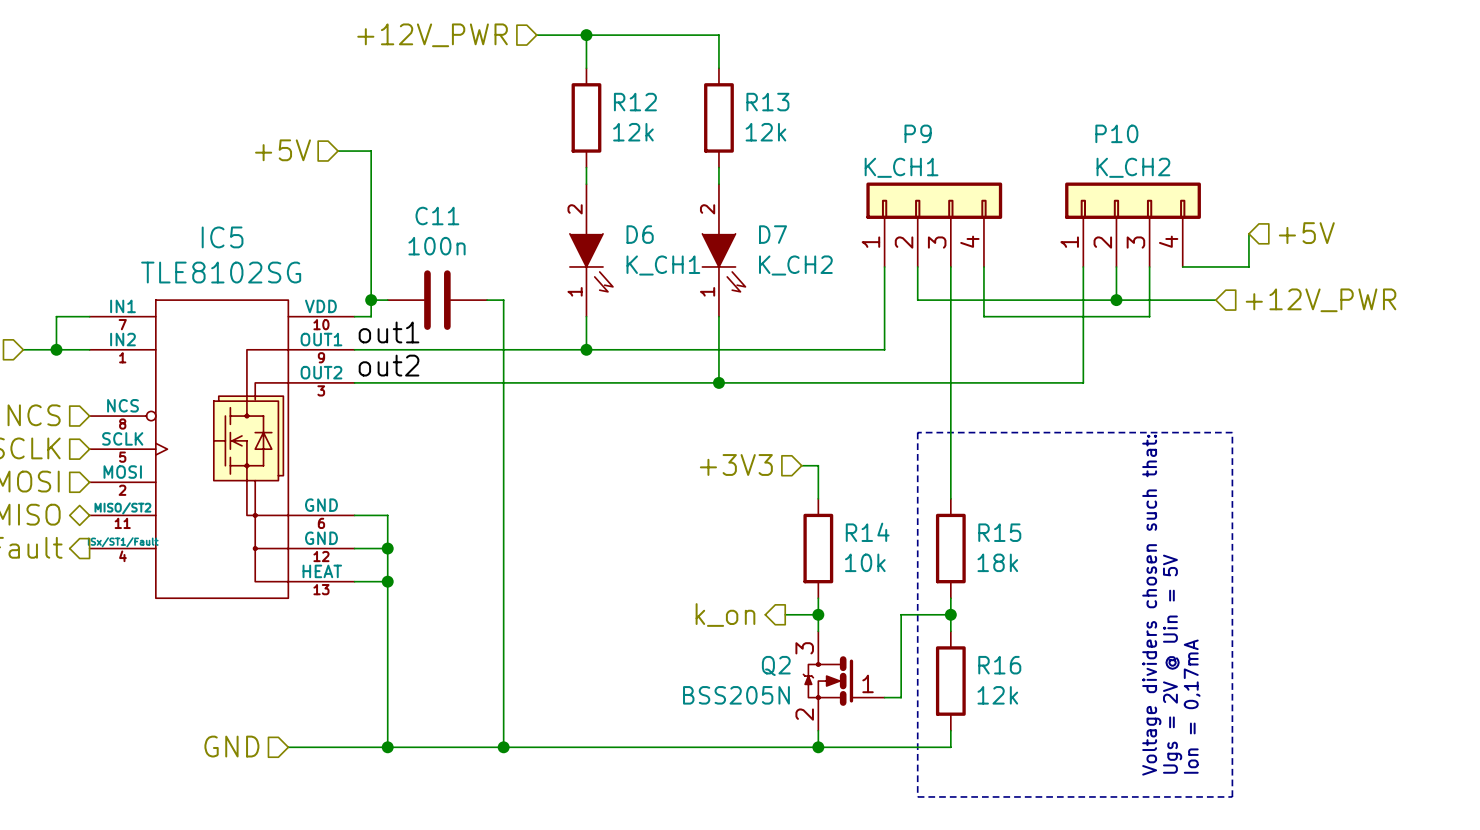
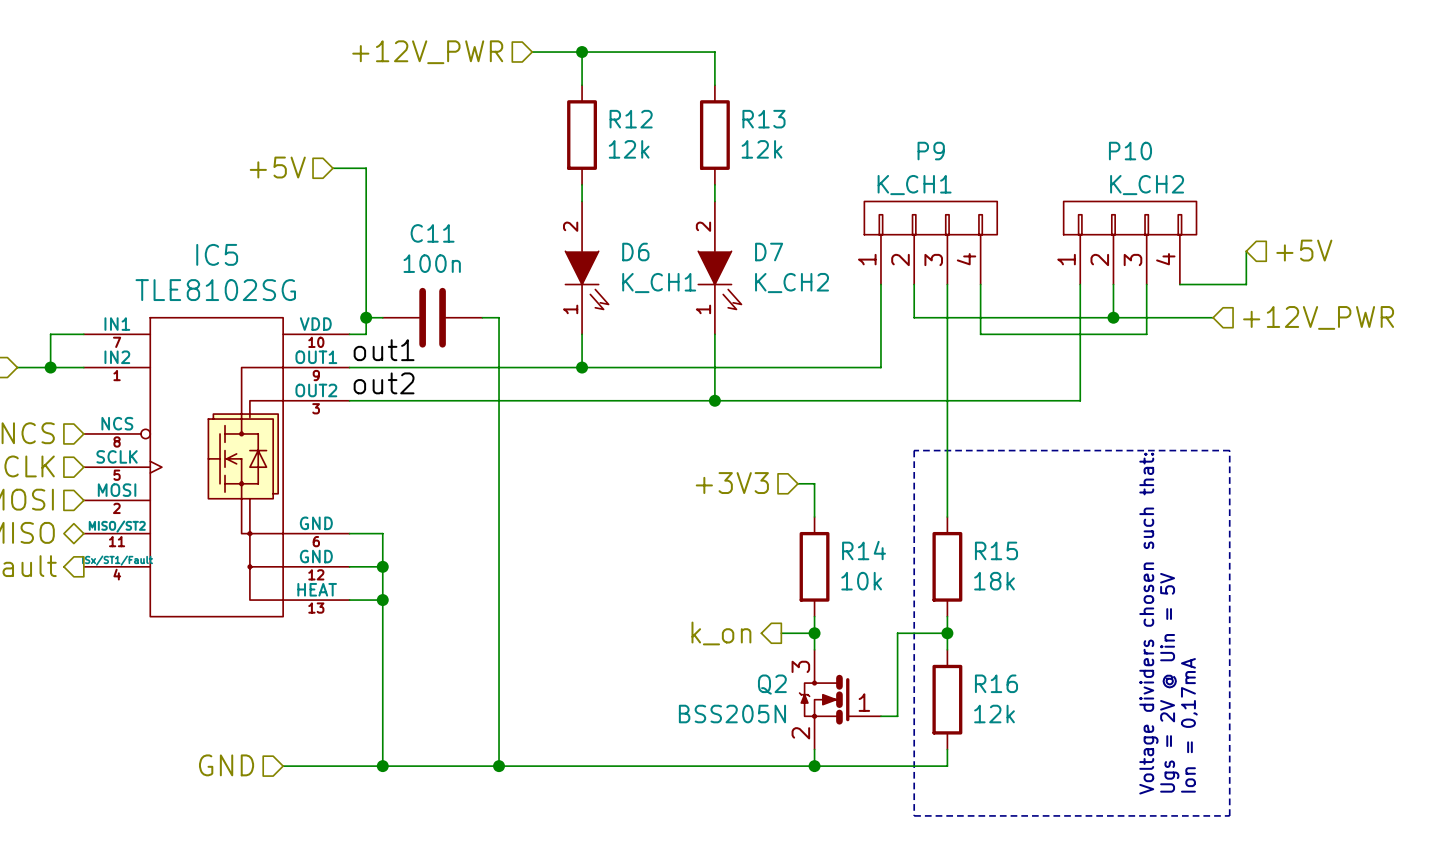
P9 symbol: [866, 182, 1003, 267] -> [864, 201, 998, 285]
P10 symbol: [1065, 182, 1201, 267] -> [1063, 201, 1197, 285]

